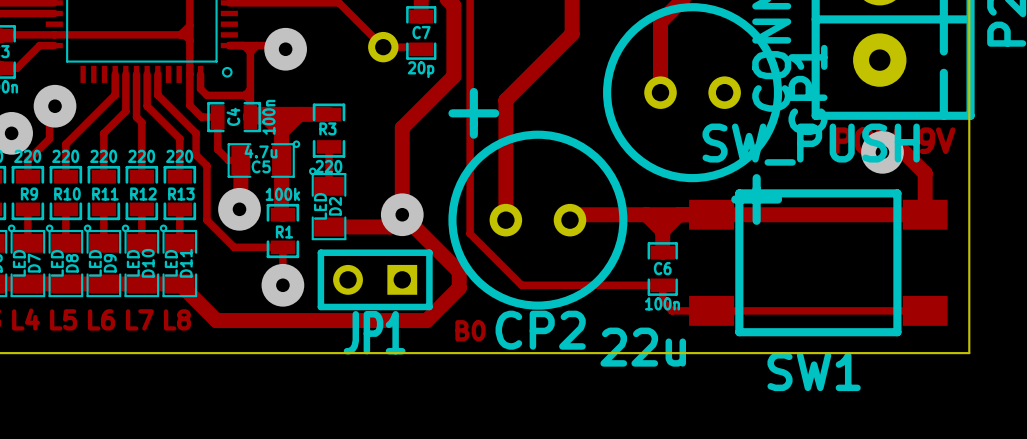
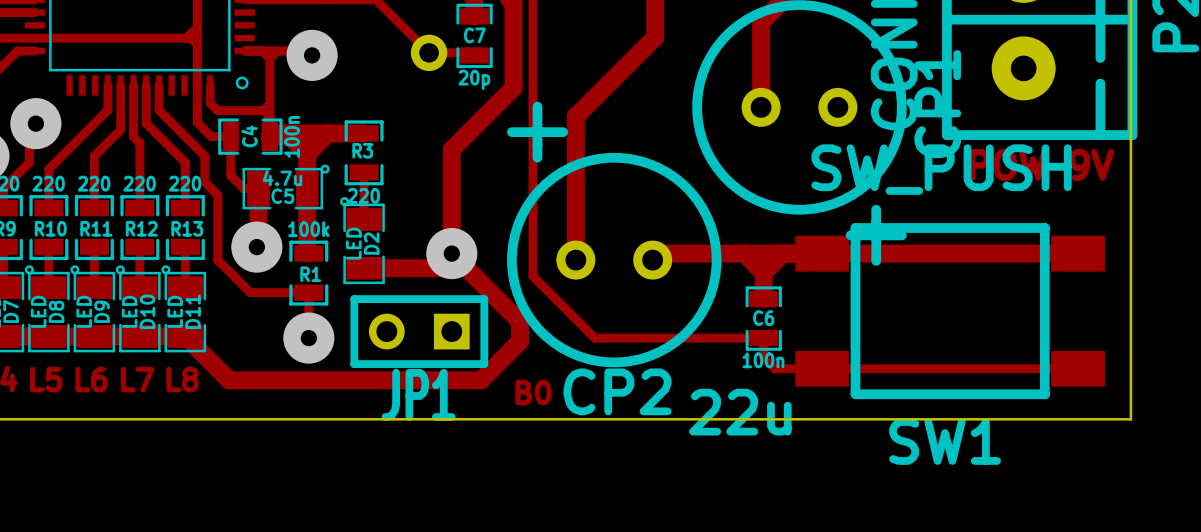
track: (882, 152) (904, 152) (925, 173) (925, 214) -> none
via: (882, 152) -> none

